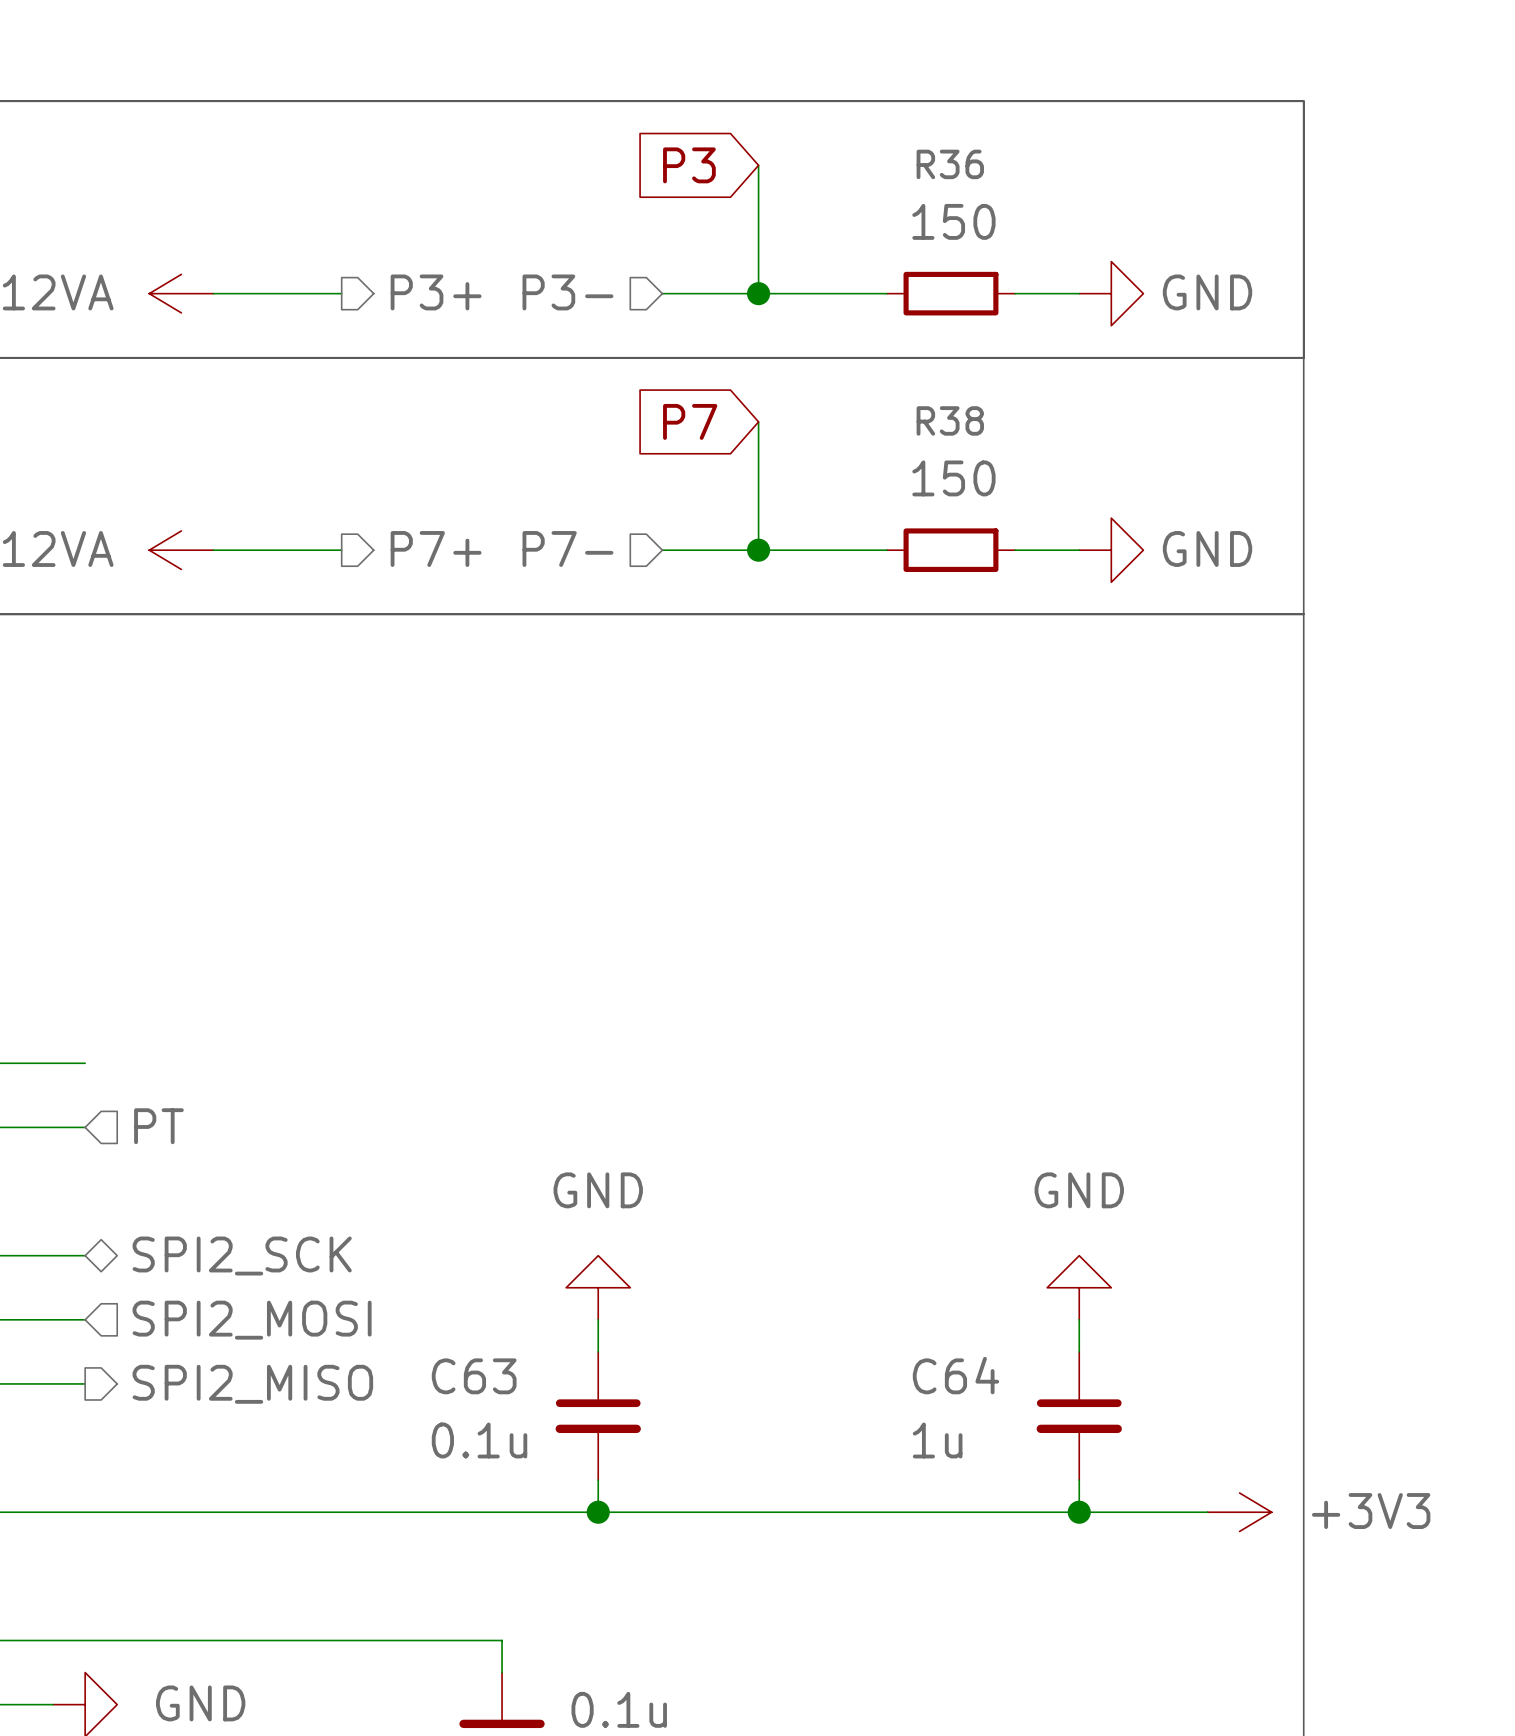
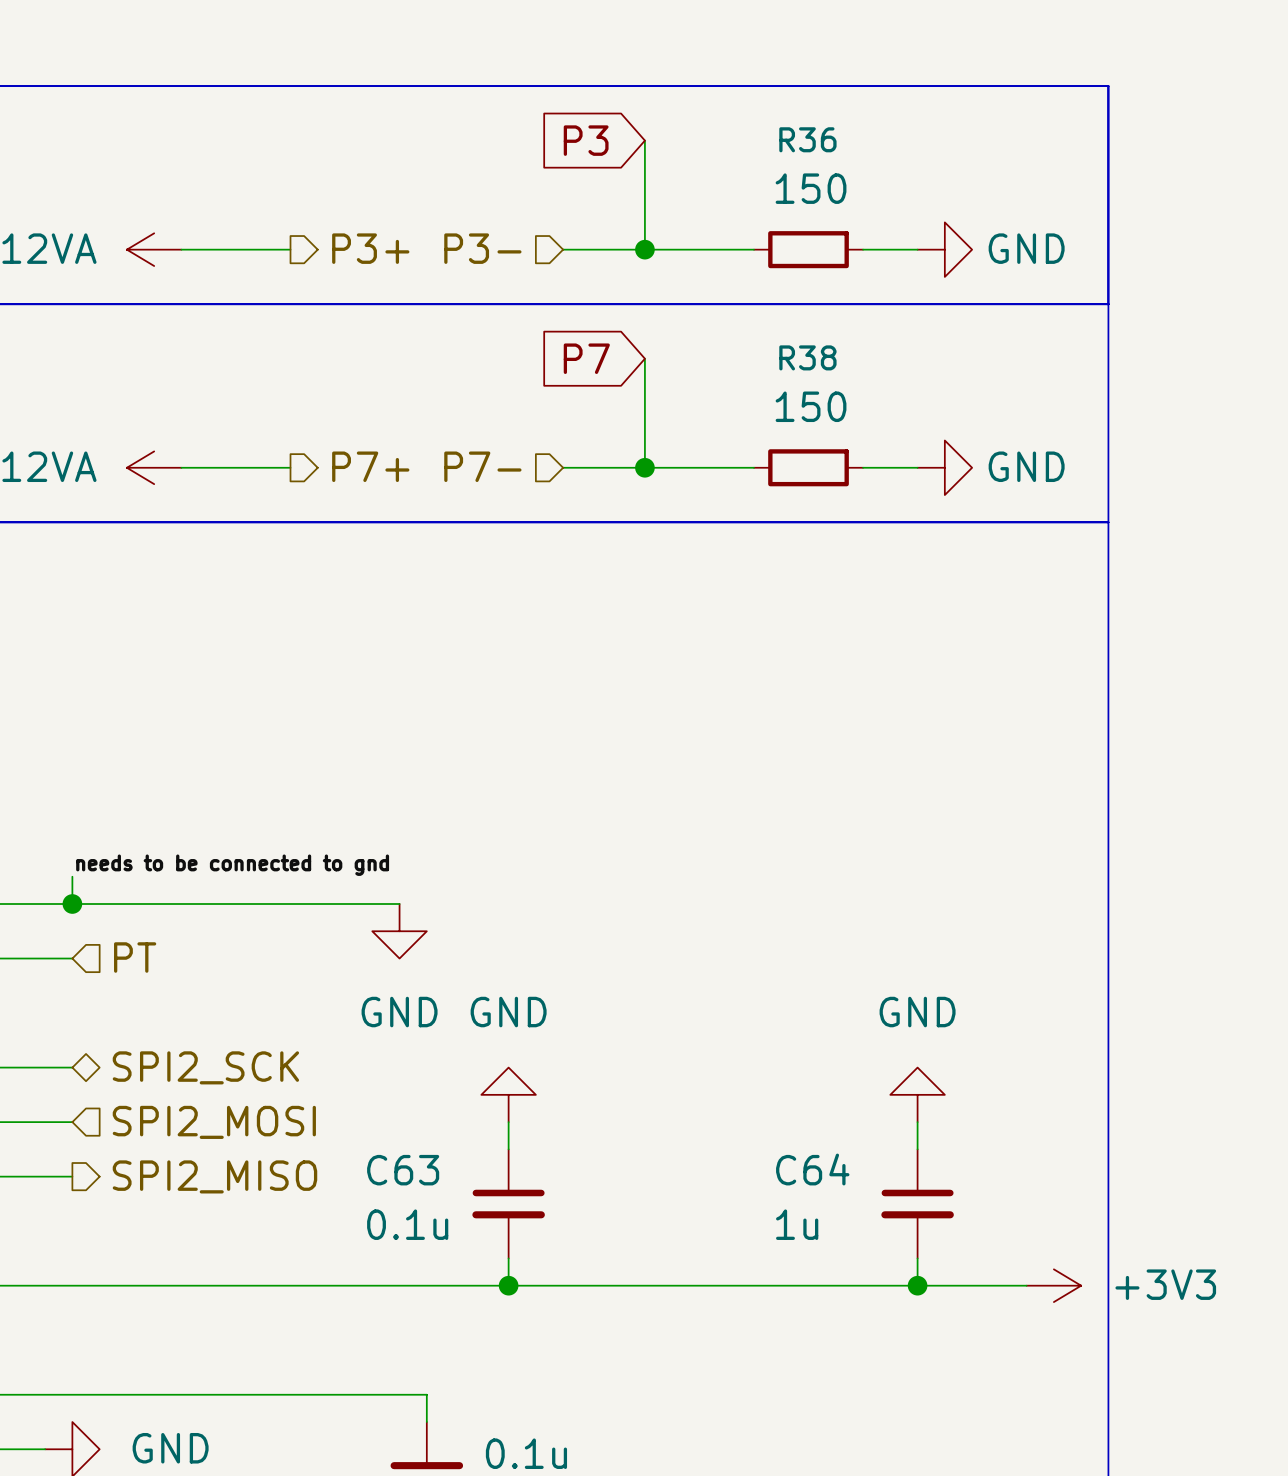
label: none -> needs to be connected to gnd (232, 865)
wire: none -> (72, 876) (72, 903) (399, 903)
junction: none -> (72, 903)
power symbol: none -> GND (399, 931)

